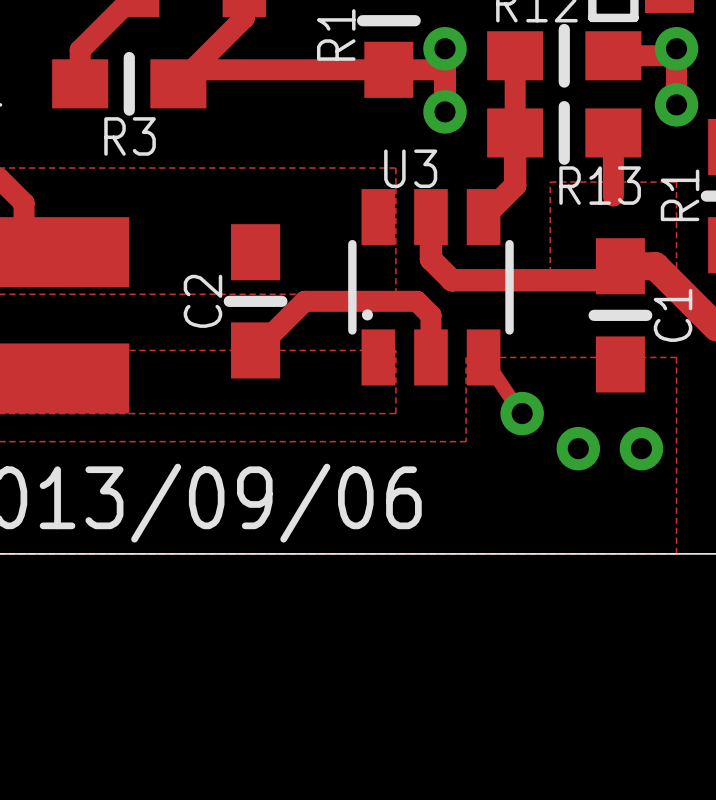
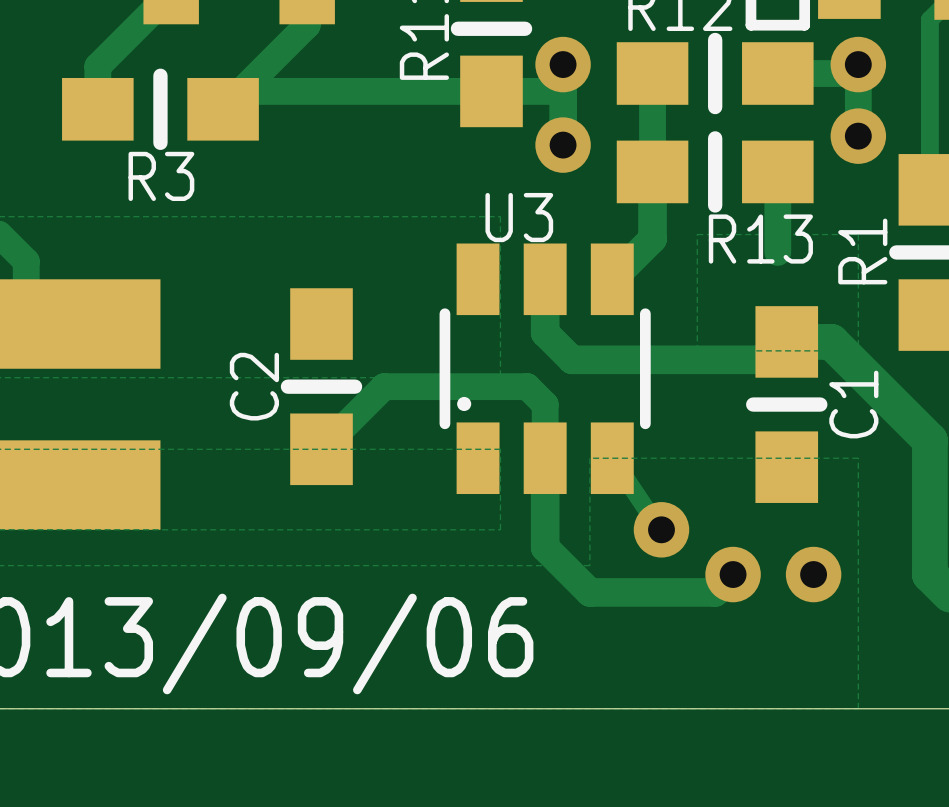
track: none -> (545, 458) (545, 547) (589, 592) (715, 592) (733, 574)

